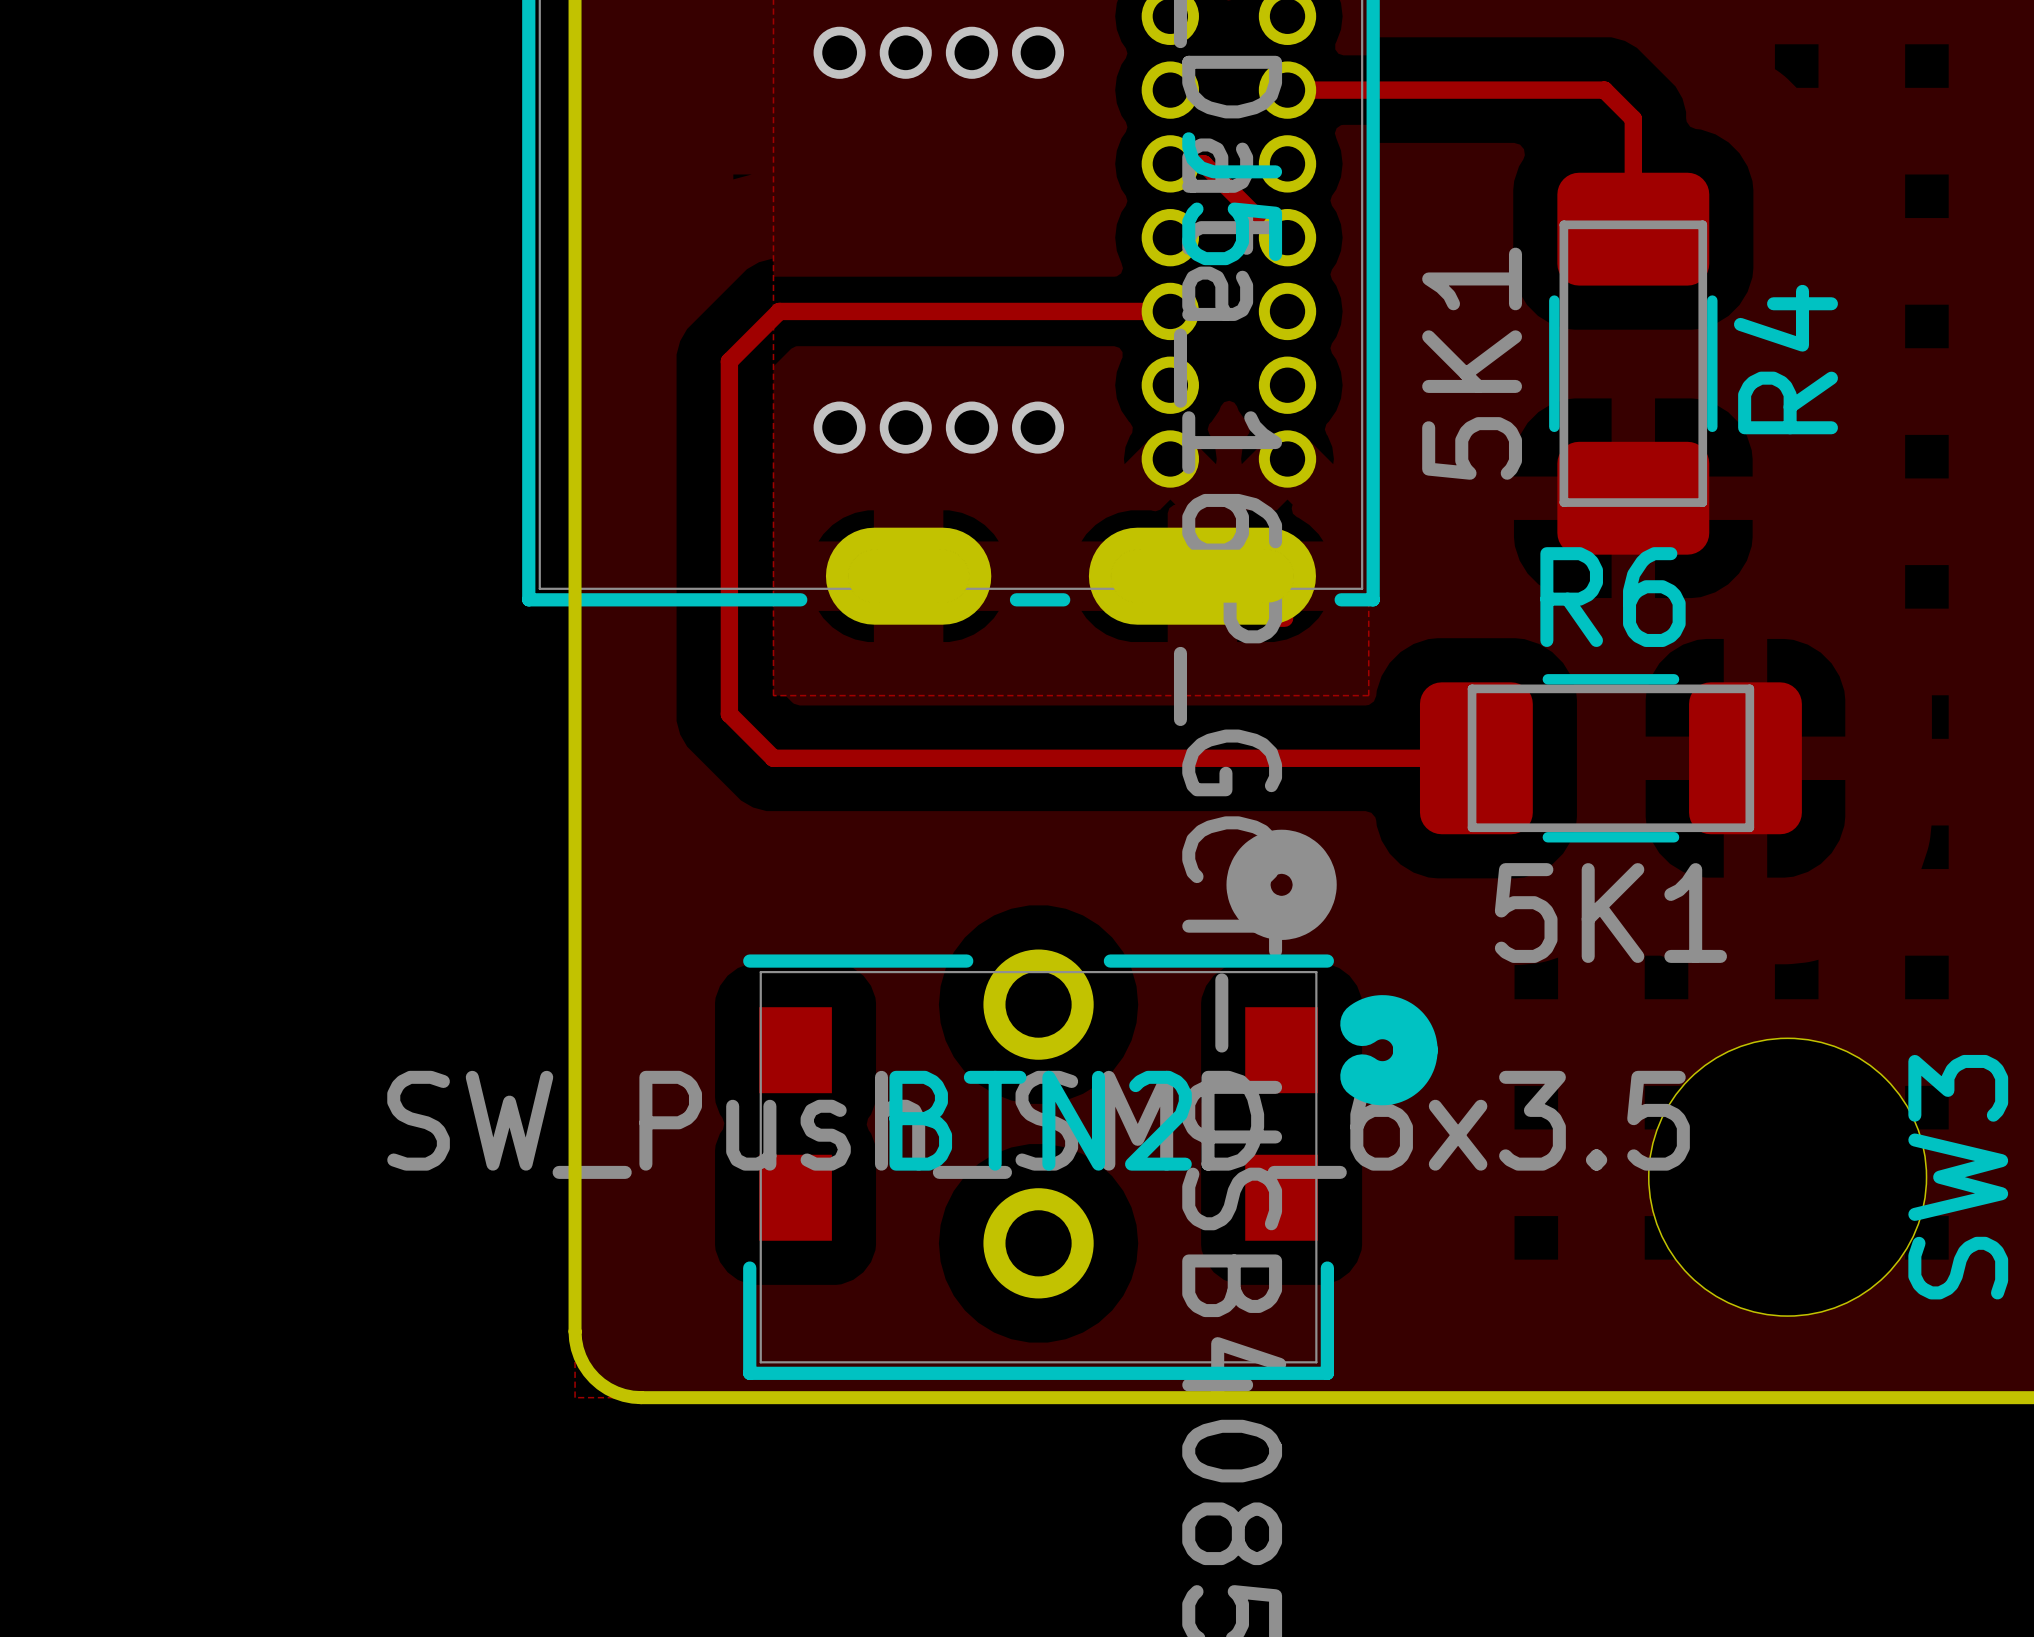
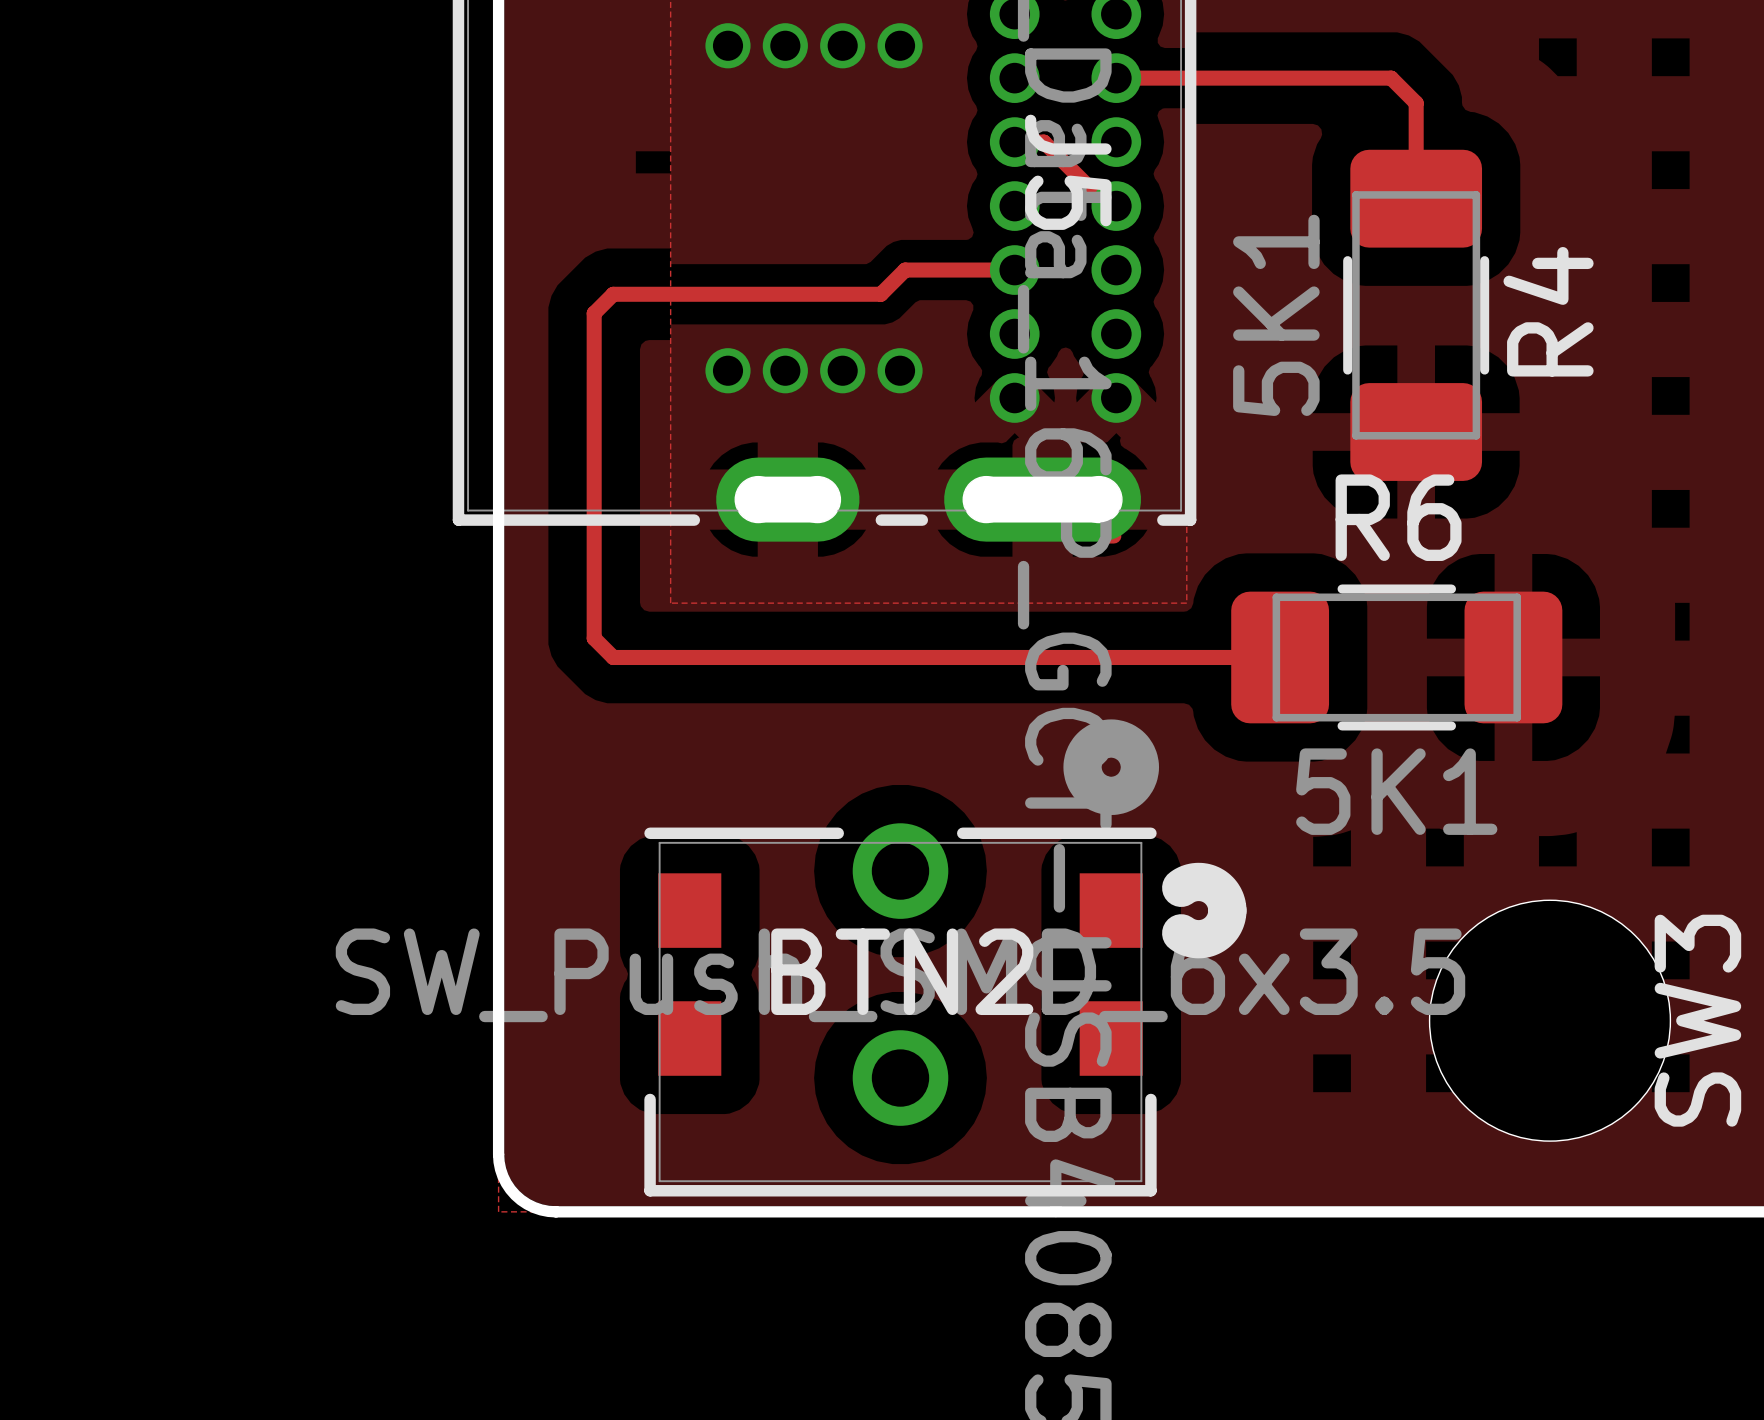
track: (1043, 311) (779, 311) (729, 361) (729, 714) (773, 758) -> (905, 270) (880, 294) (613, 294) (594, 313) (594, 638) (613, 657) (670, 657)

